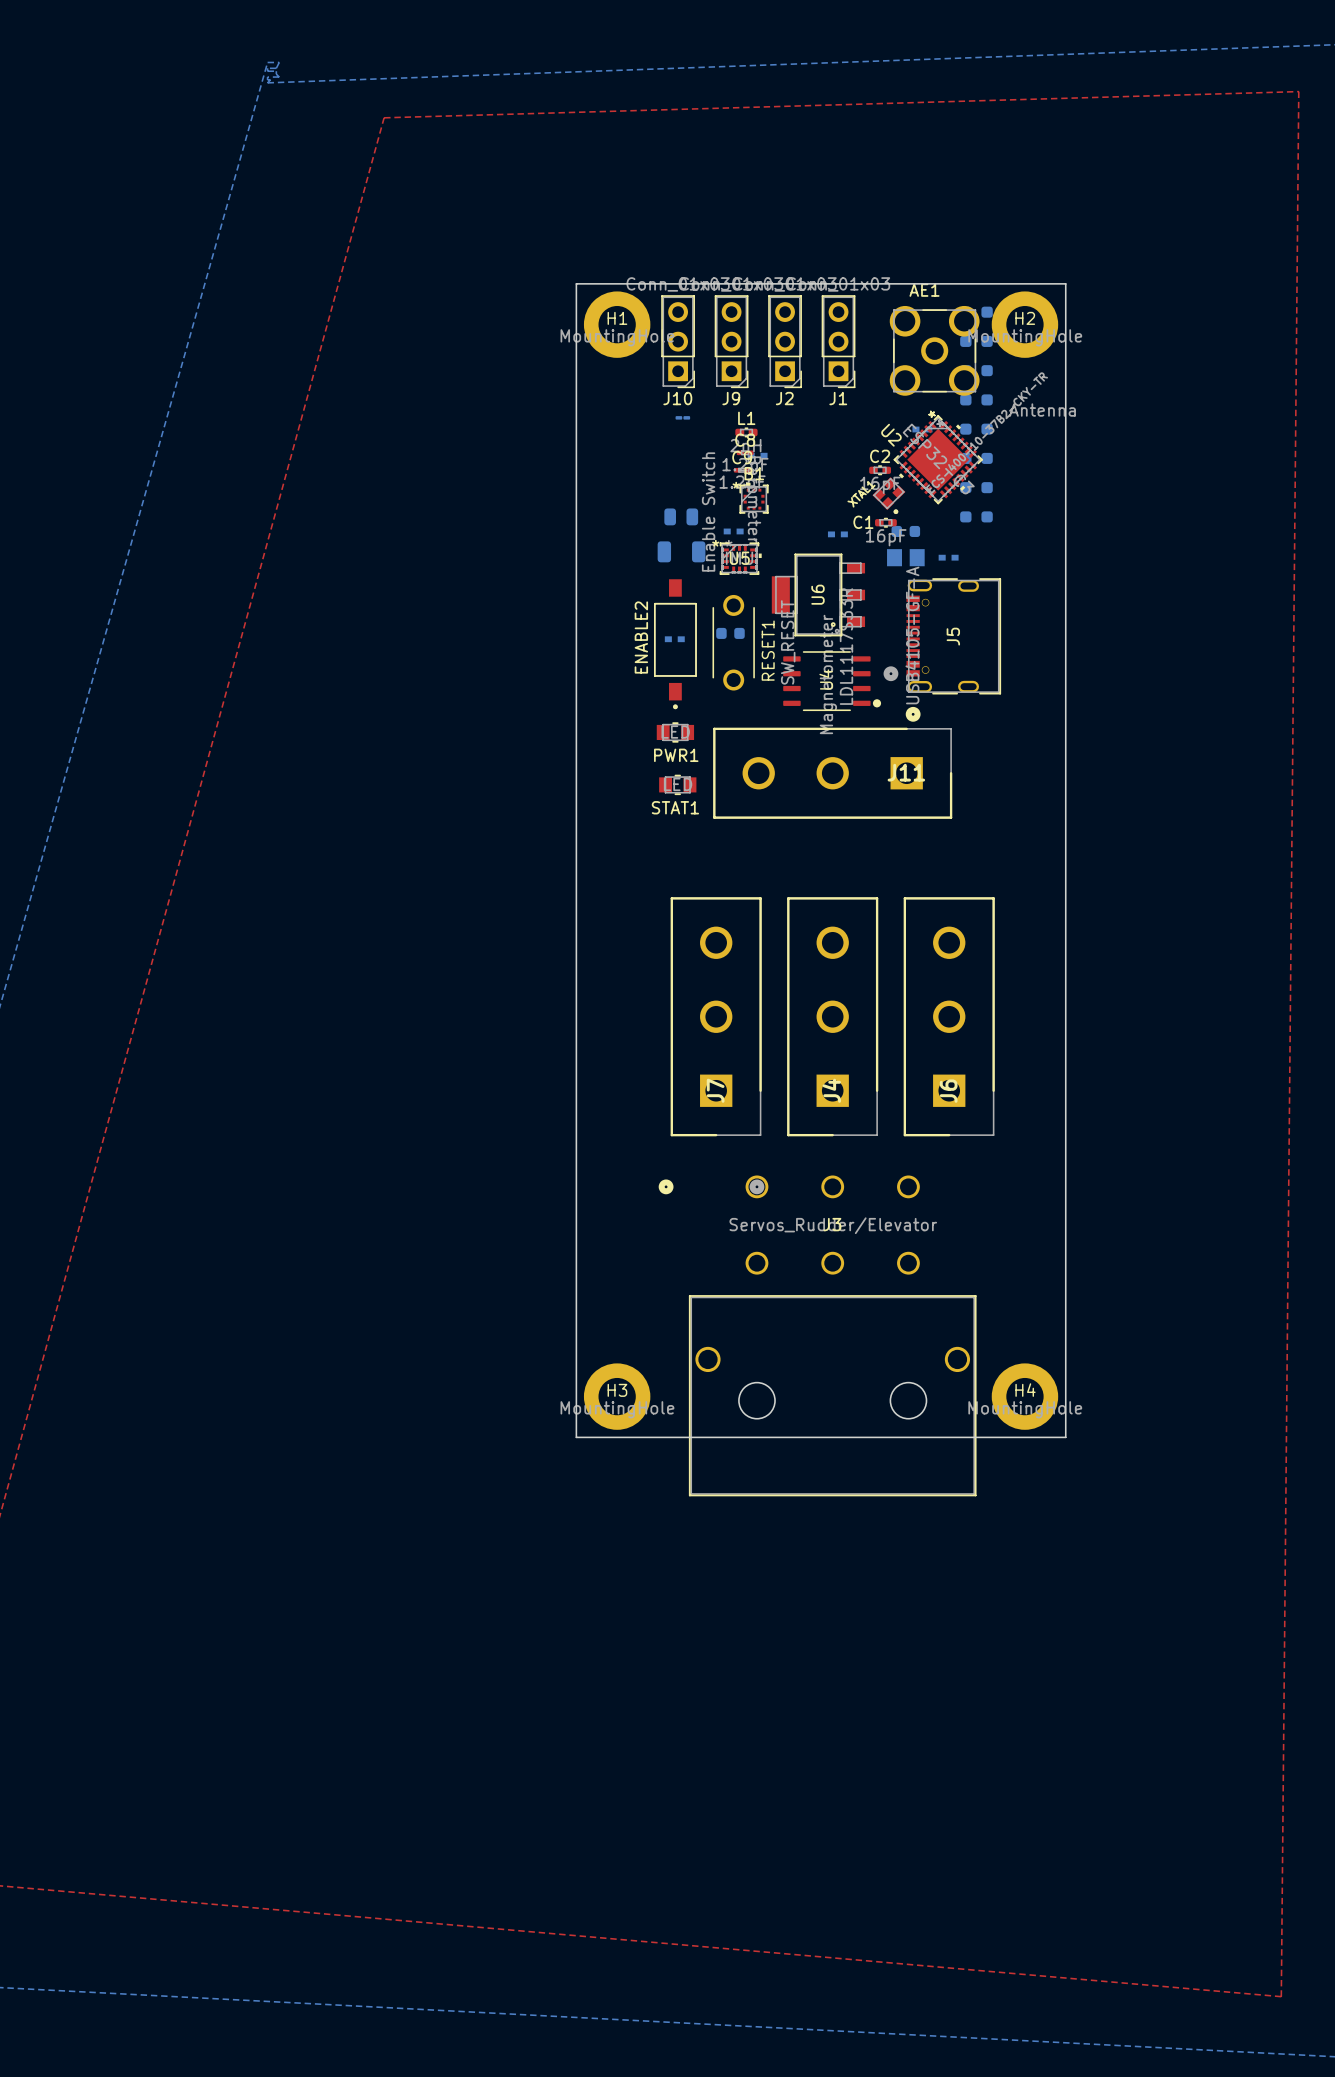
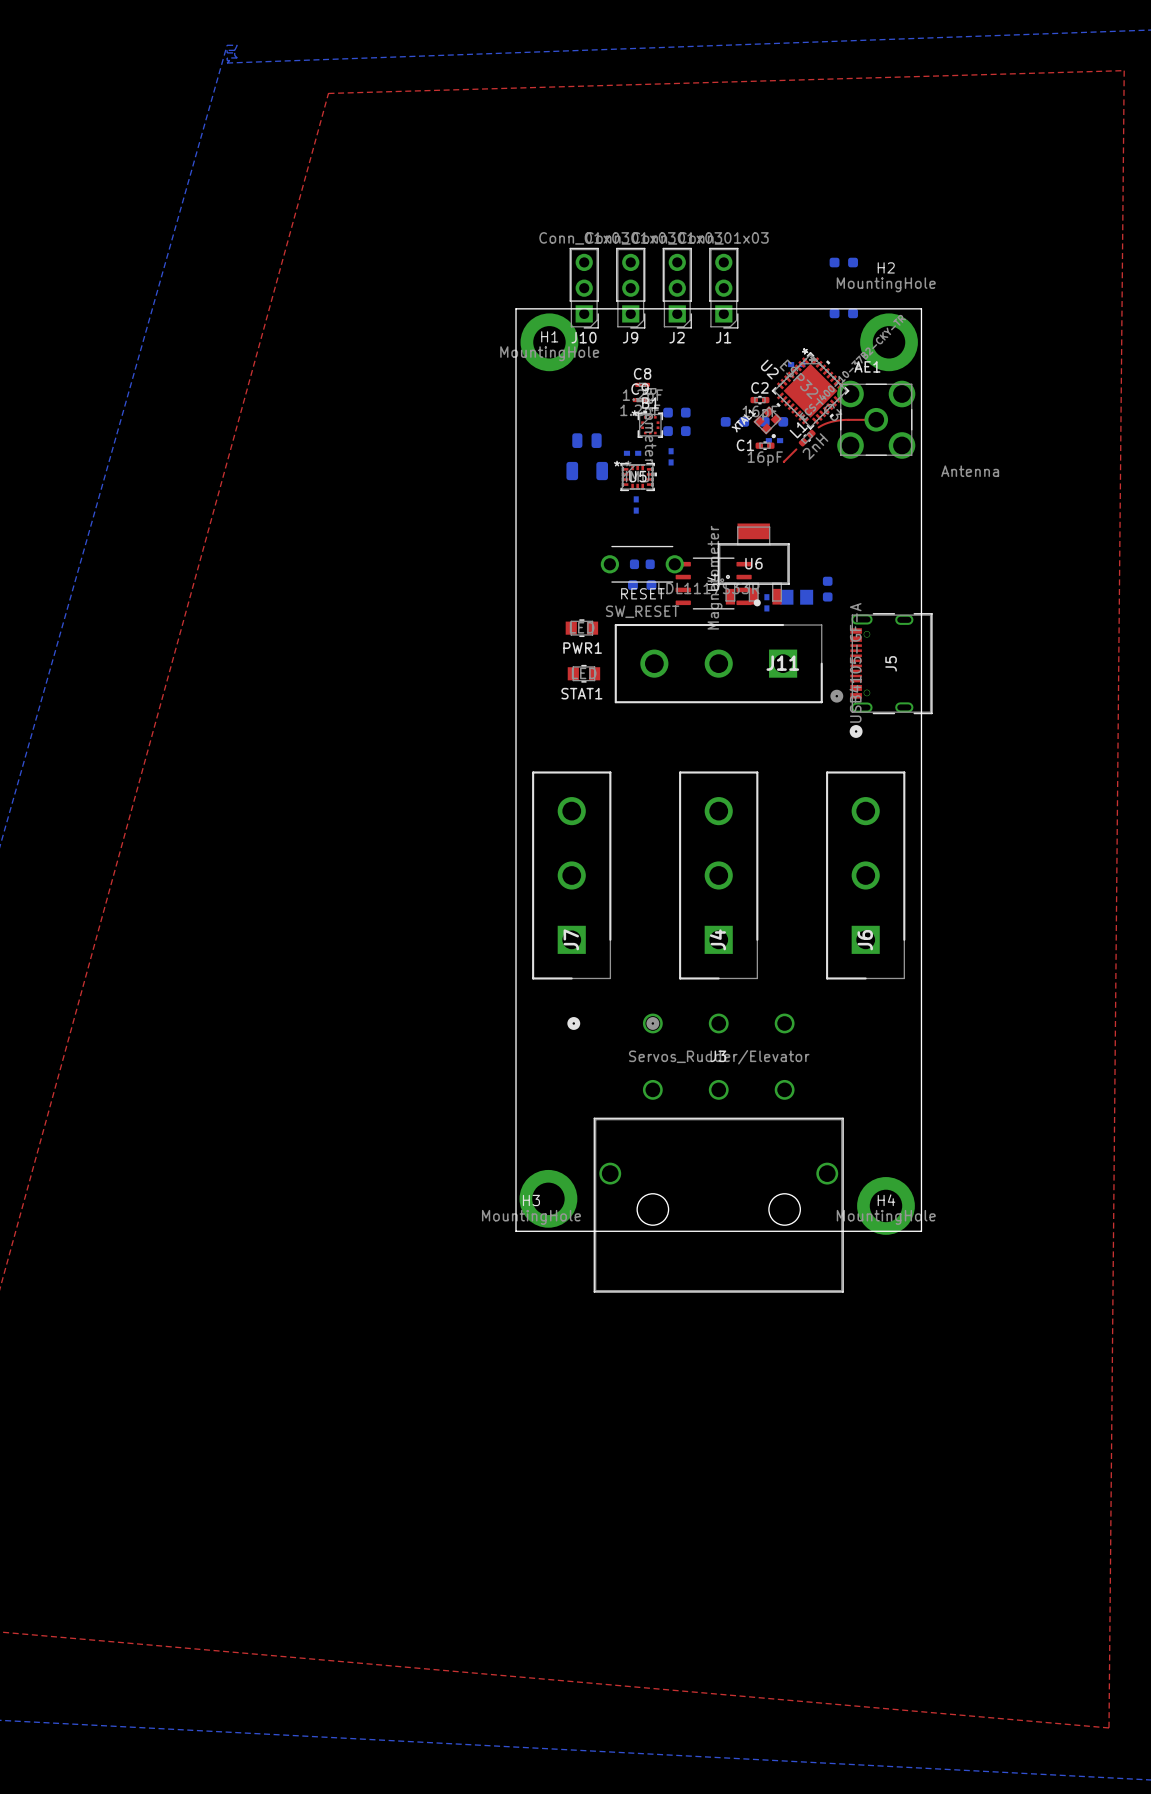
H1 position: (617, 324) -> (549, 342)
H2 position: (1024, 324) -> (889, 342)
part: (976, 341) -> none
AE1 position: (934, 350) -> (876, 419)
board edge: (1065, 365) (1065, 283) (576, 283) (576, 1437) (1065, 1437) (1065, 1425) -> (921, 308) (516, 308) (516, 1231) (921, 1231)
part: (976, 399) -> none
part: (682, 417) -> none
part: (976, 429) -> none
L1 rotation: 0° (746, 432) -> 45° counterclockwise (807, 438)
L1 position: (746, 432) -> (807, 438)
part: (757, 455) -> none
part: (976, 458) -> none
part: (976, 487) -> none
top track: none -> (876, 419) (837, 420) (818, 427)
part: none -> (668, 421)
part: none -> (685, 421)
part: none -> (734, 421)
part: none -> (773, 421)
part: none -> (774, 440)
part: (976, 516) -> none
top track: none -> (796, 449) (783, 461)
part: (905, 531) -> none
part: (837, 534) -> none
part: none -> (671, 456)
part position: (905, 557) -> (796, 597)
part: (948, 557) -> none
part: none -> (636, 504)
U6 rotation: 0° (818, 594) -> 90° clockwise (753, 564)
U6 position: (818, 594) -> (753, 564)
part position: (730, 633) -> (642, 564)
part: (674, 639) -> none
RESET1: SW_RESET (733, 642) -> none
ENABLE2: Enable Switch (675, 644) -> none
J5 position: (942, 649) -> (881, 675)
RESET: none -> SW_RESET (642, 564)
part: none -> (642, 585)
part: none -> (827, 589)
part: none -> (766, 602)
J7 position: (716, 1016) -> (571, 875)
J6 position: (949, 1016) -> (865, 875)
H3 position: (617, 1396) -> (548, 1198)

